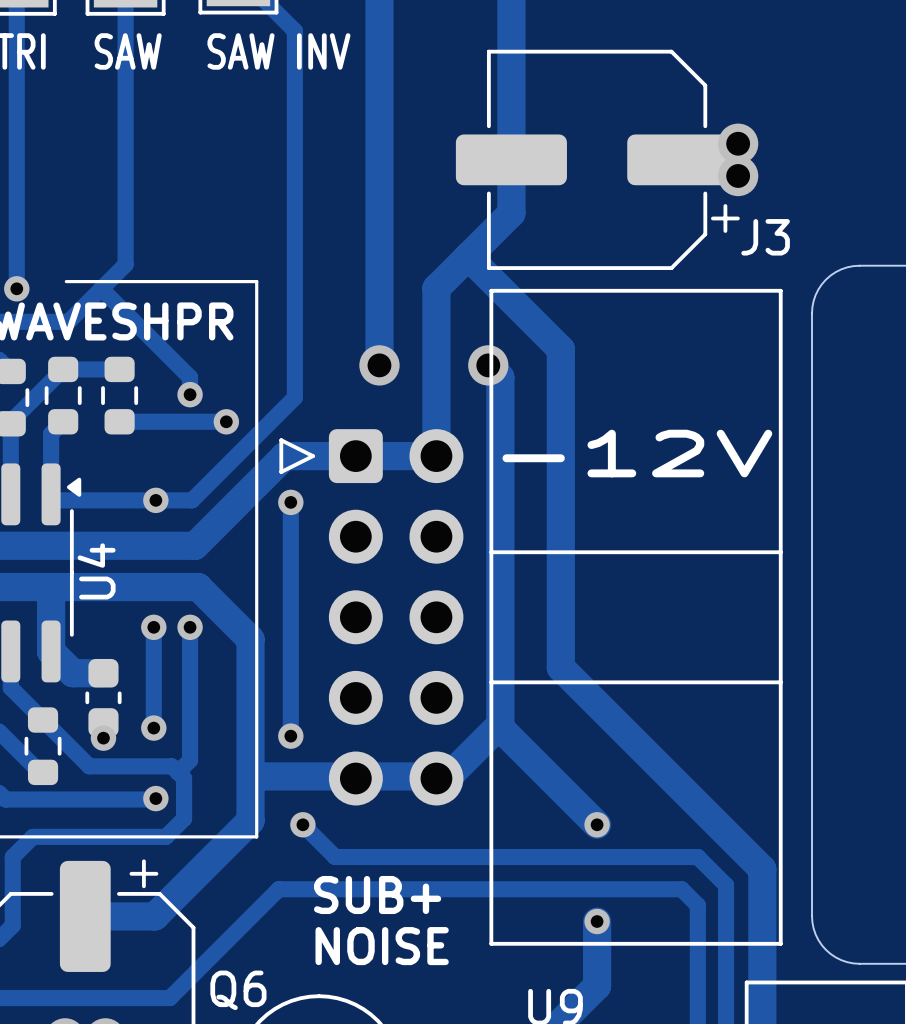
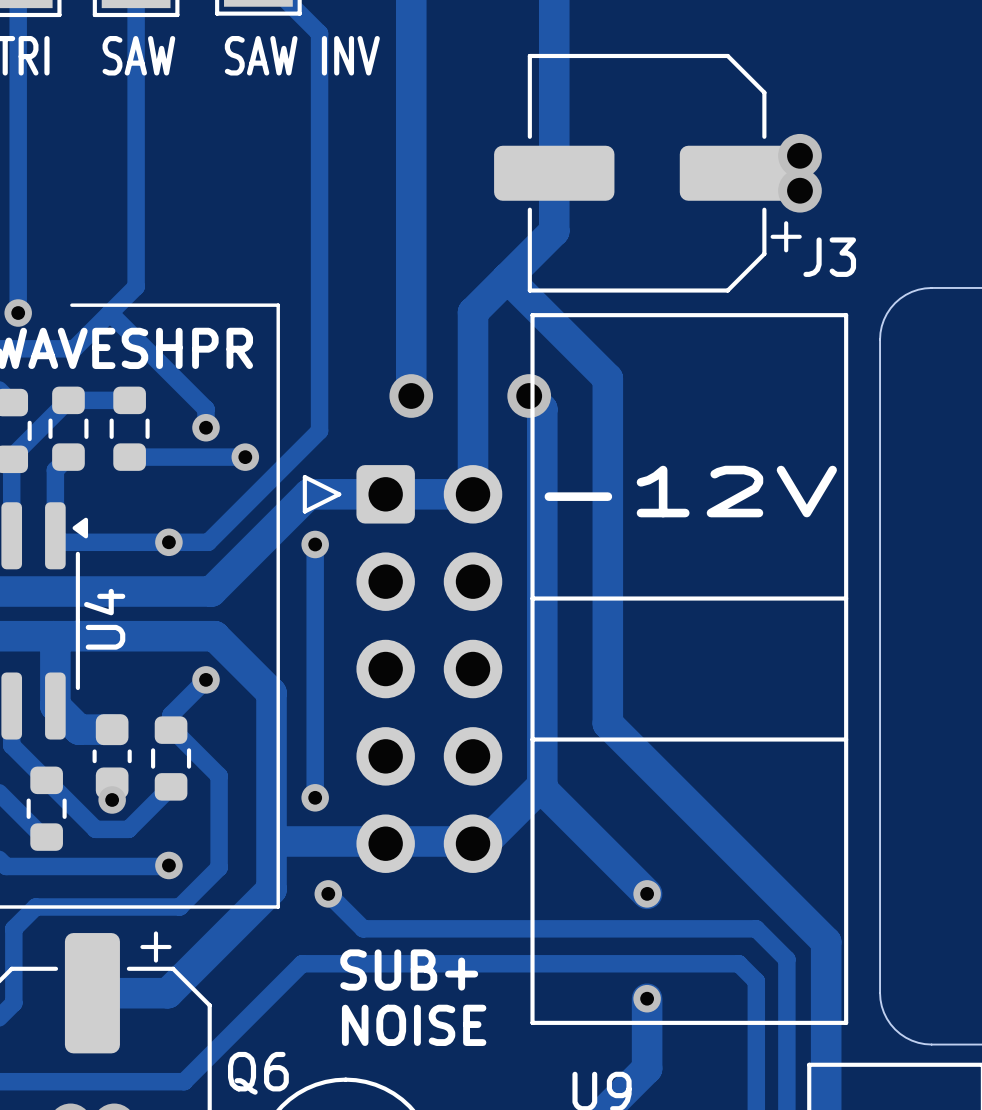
track: (153, 627) (153, 728) -> none
via: (153, 627) -> none
track: (190, 627) (190, 760) (177, 772) -> (206, 679) (171, 714) (171, 730) (173, 730) (219, 775) (219, 867) (199, 887)
part: none -> (171, 758)
via: (153, 728) -> none
track: (88, 765) (171, 766) (184, 778) (184, 818) -> (95, 829) (128, 829) (171, 786)

